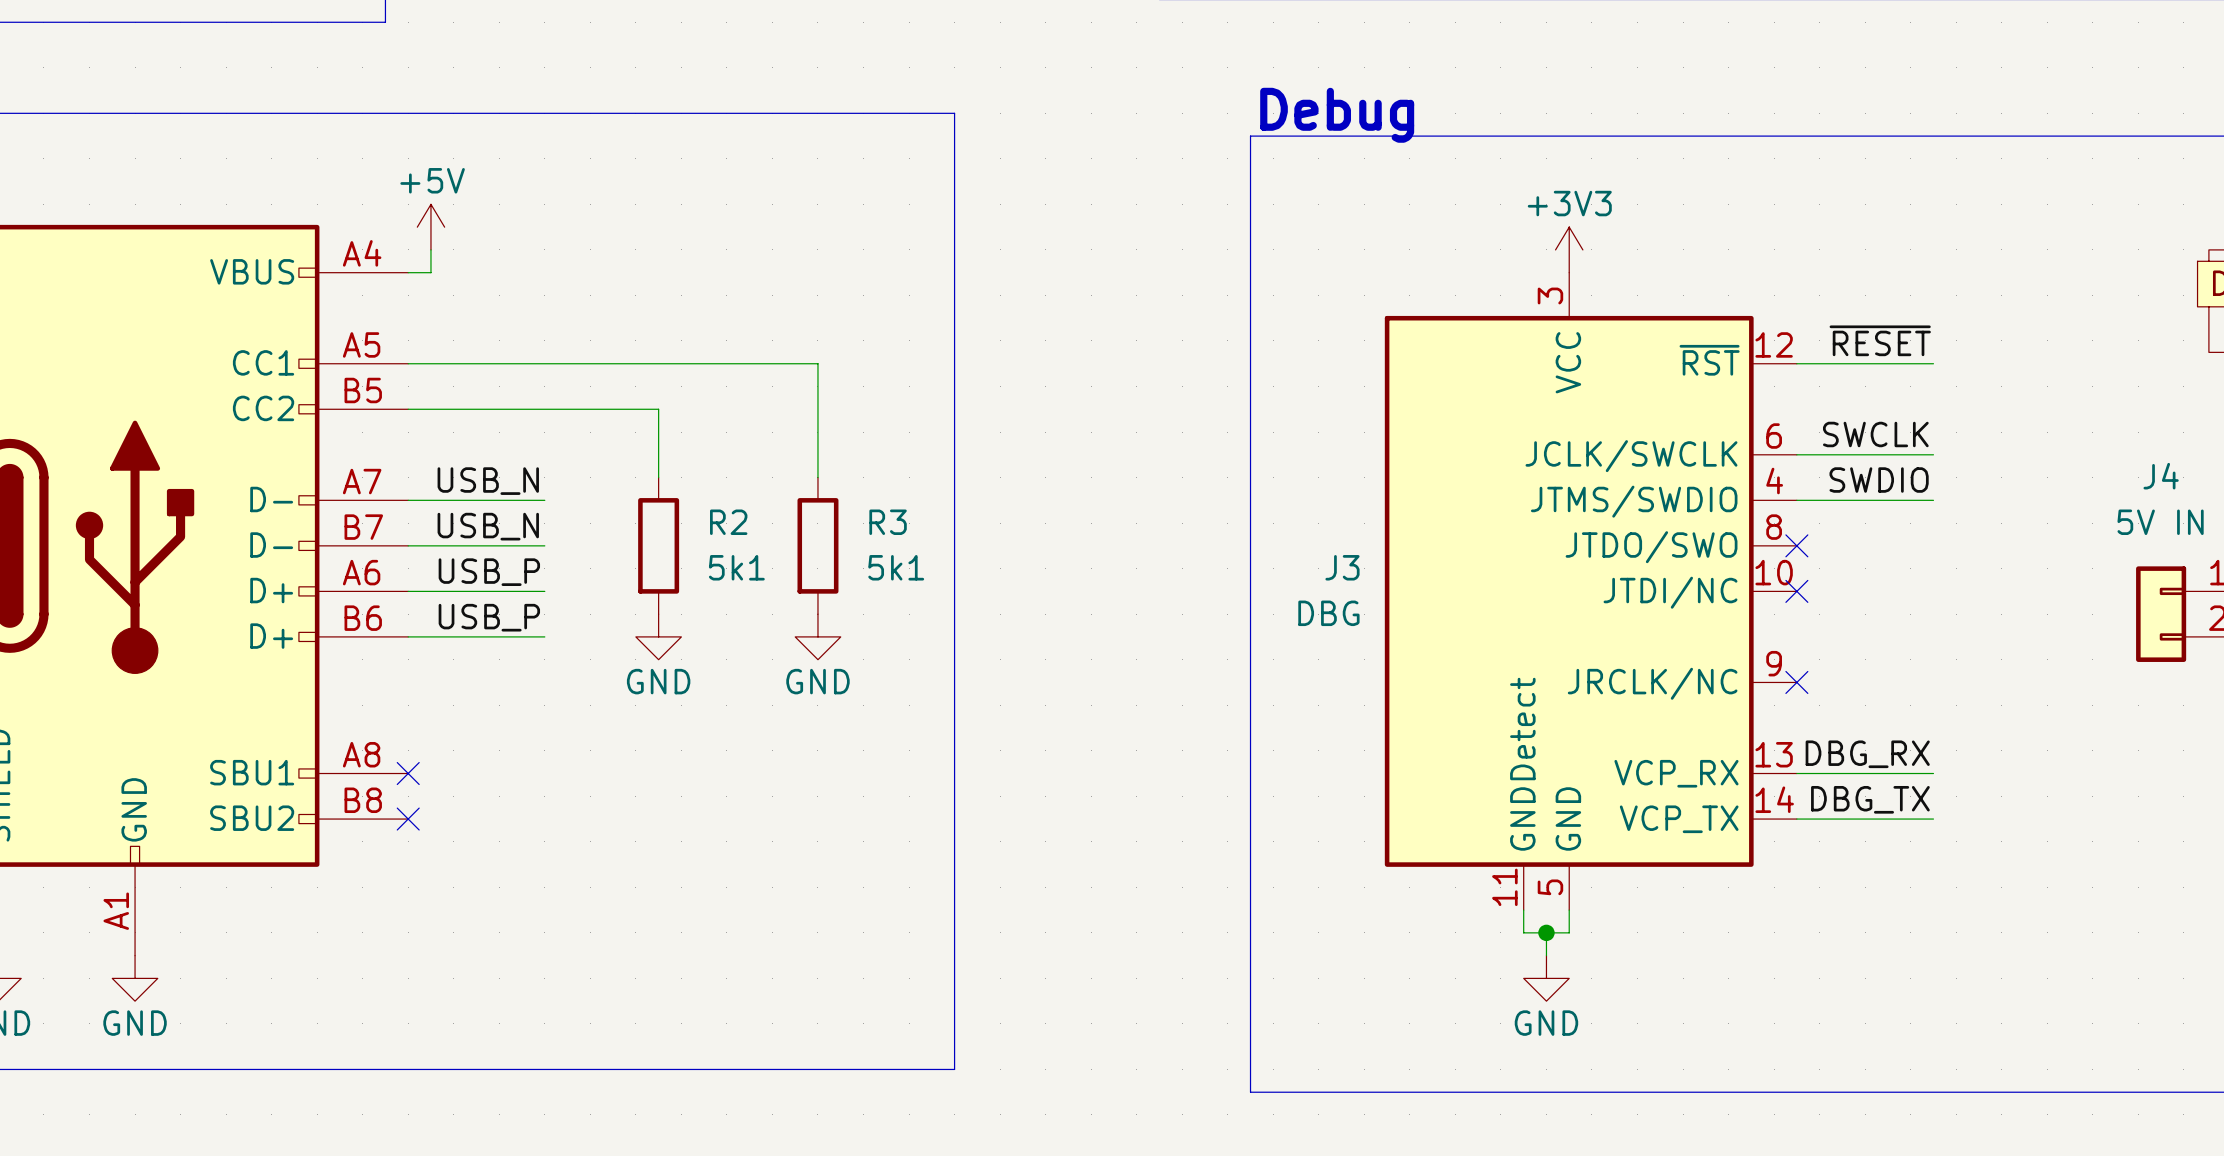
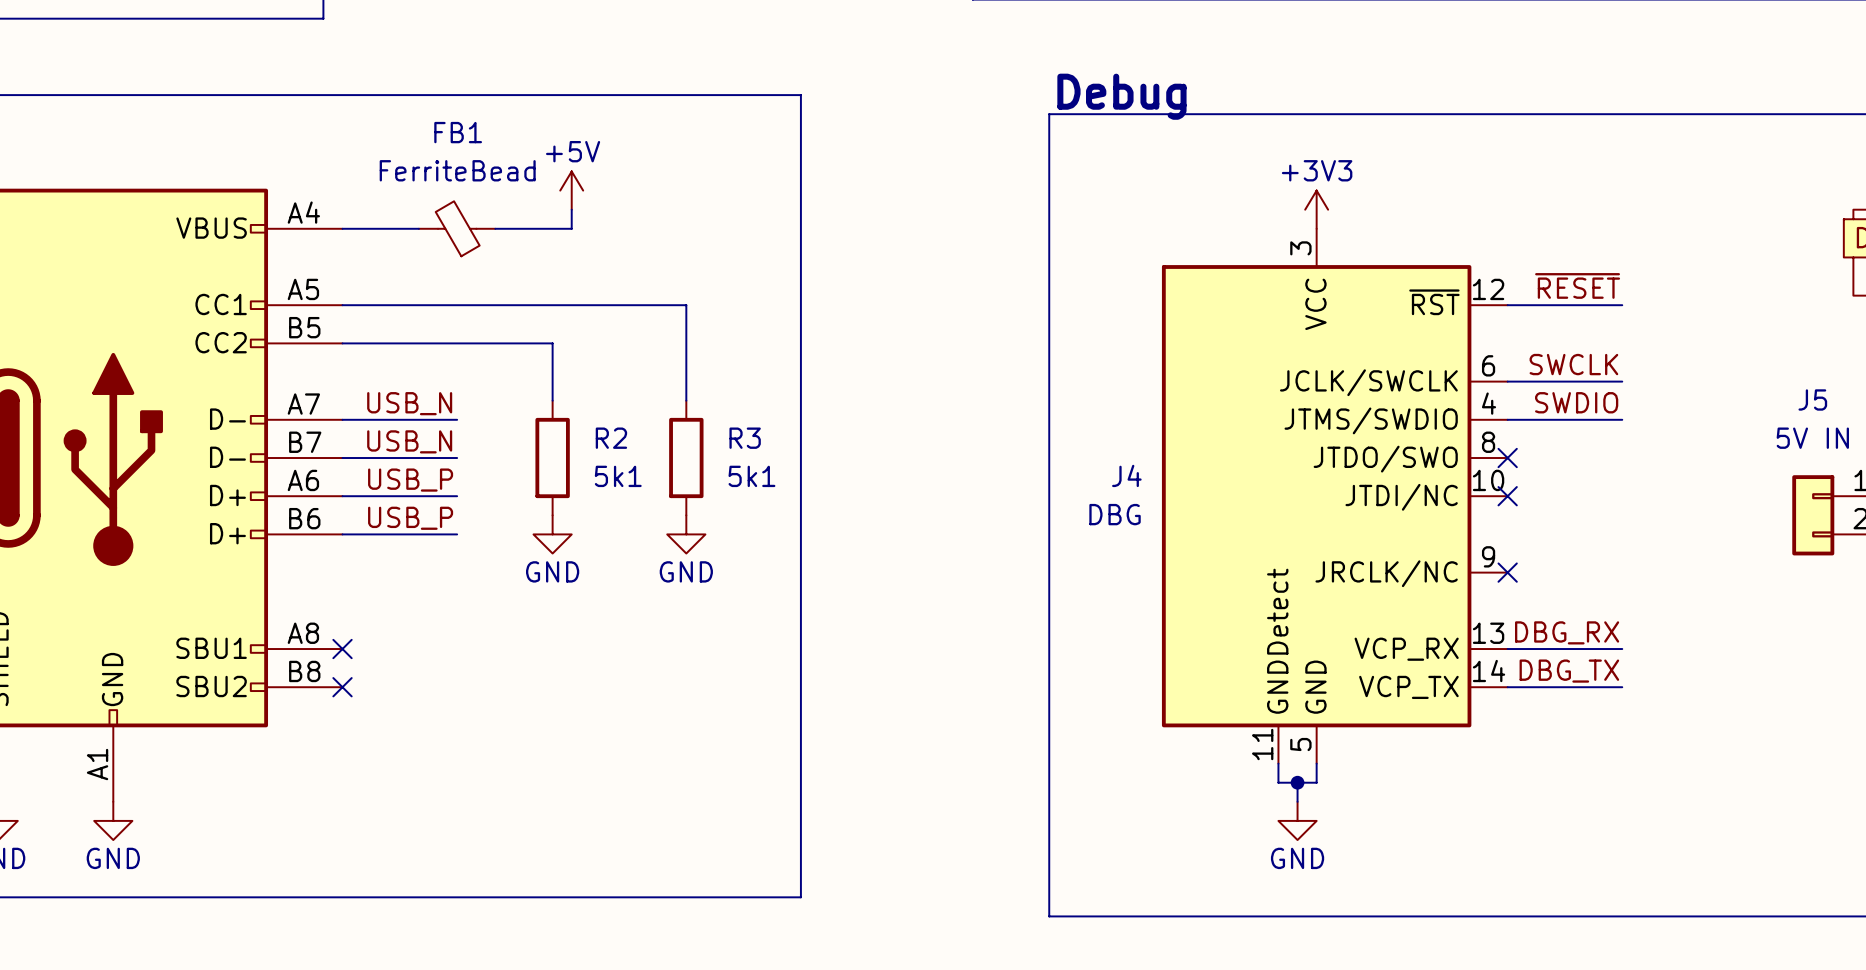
power symbol position: +5V (430, 227) -> +5V (571, 190)
wire: (430, 249) (430, 272) -> (418, 228) (361, 228)
wire: none -> (571, 209) (571, 228) (495, 228)
FB1: none -> FerriteBead (457, 228)
J4 name: J4 (2161, 476) -> J5 (1812, 399)
J3 name: J3 (1342, 567) -> J4 (1126, 475)

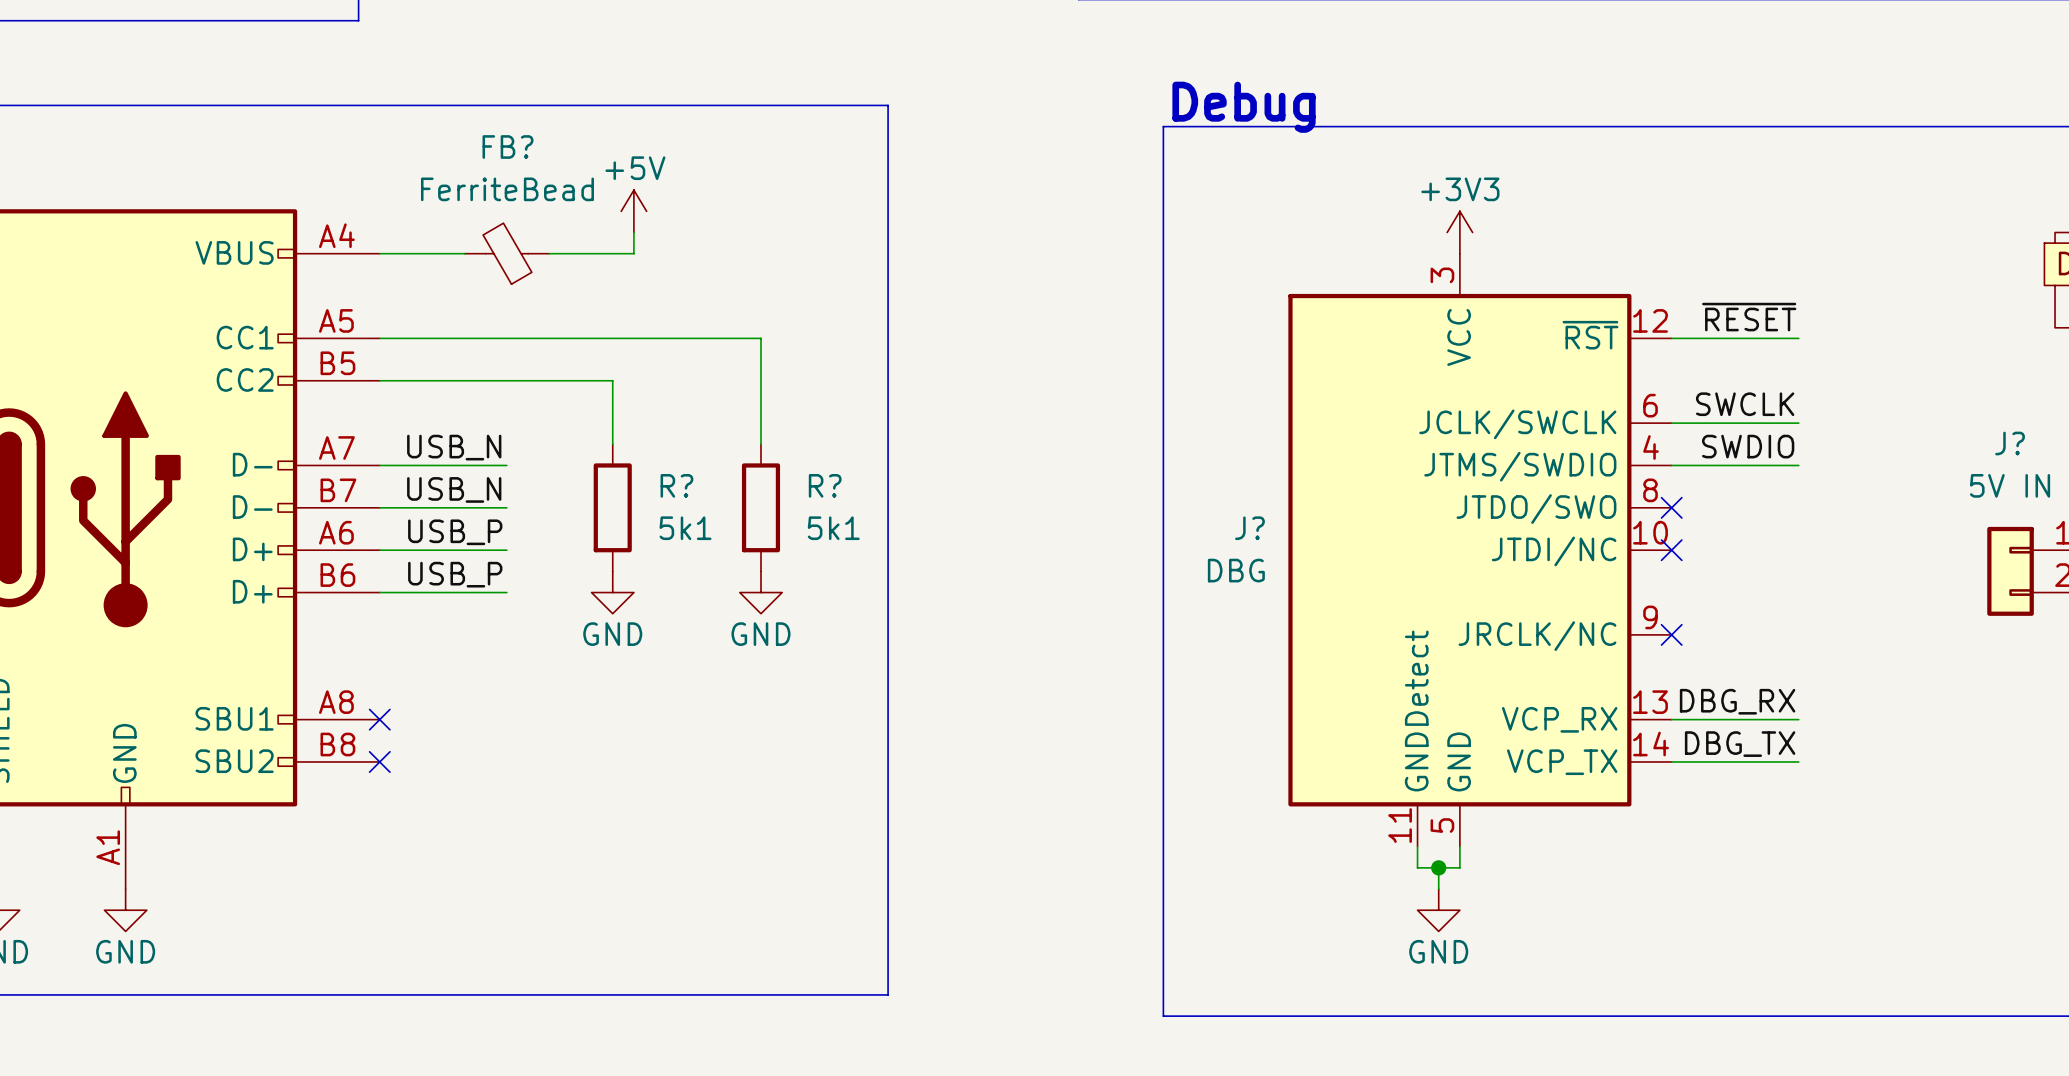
FB1 name: FB1 (458, 132) -> FB? (507, 147)
J5 name: J5 (1812, 399) -> J? (2010, 443)
R2 name: R2 (611, 438) -> R? (676, 485)
R3 name: R3 (745, 438) -> R? (825, 485)
J4 name: J4 (1126, 475) -> J? (1249, 528)

